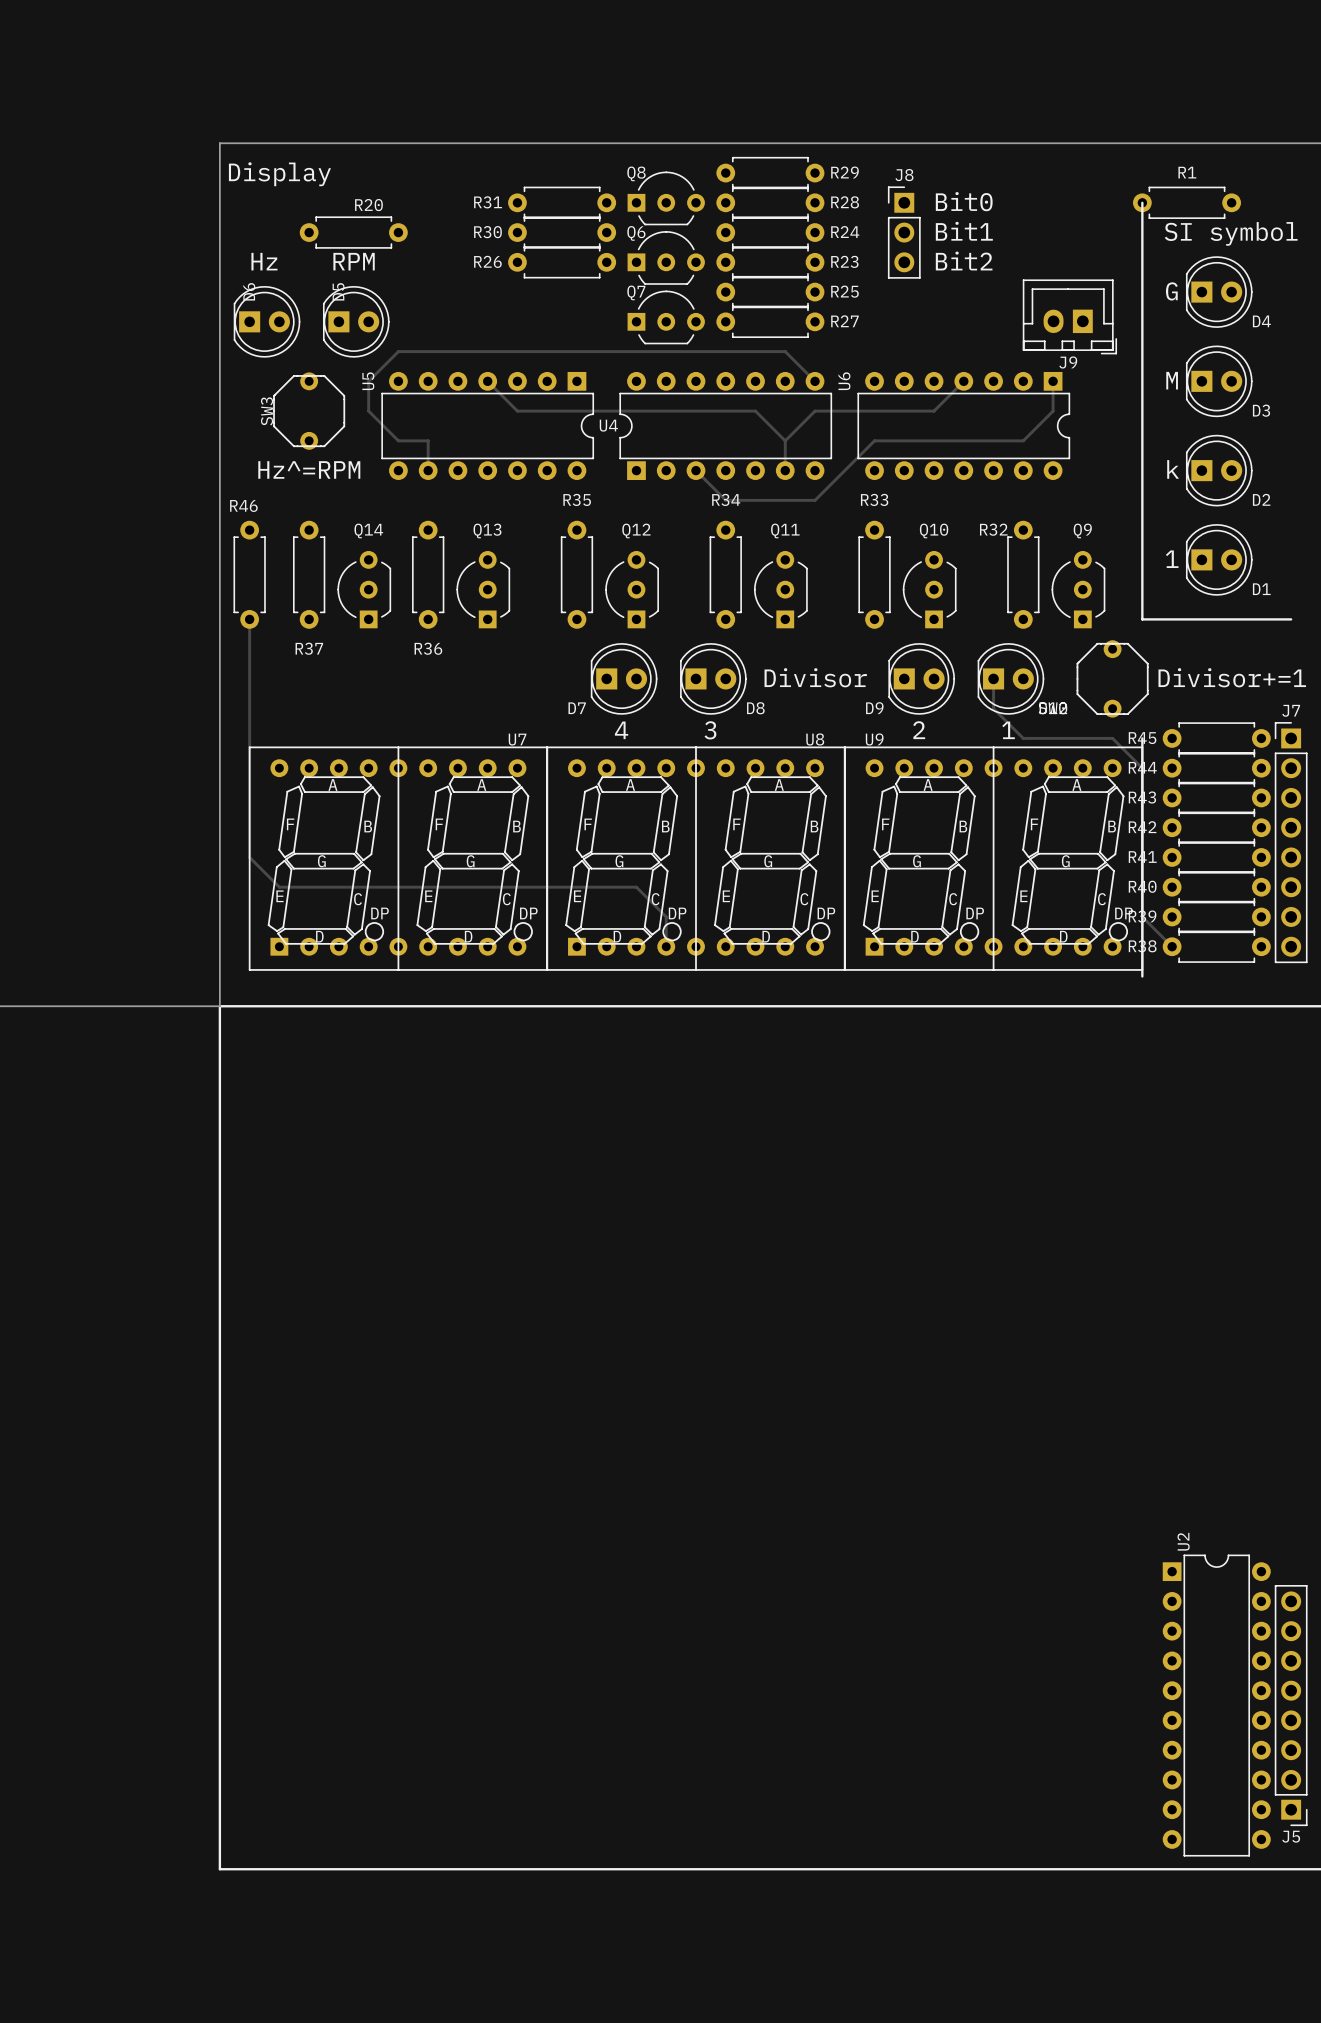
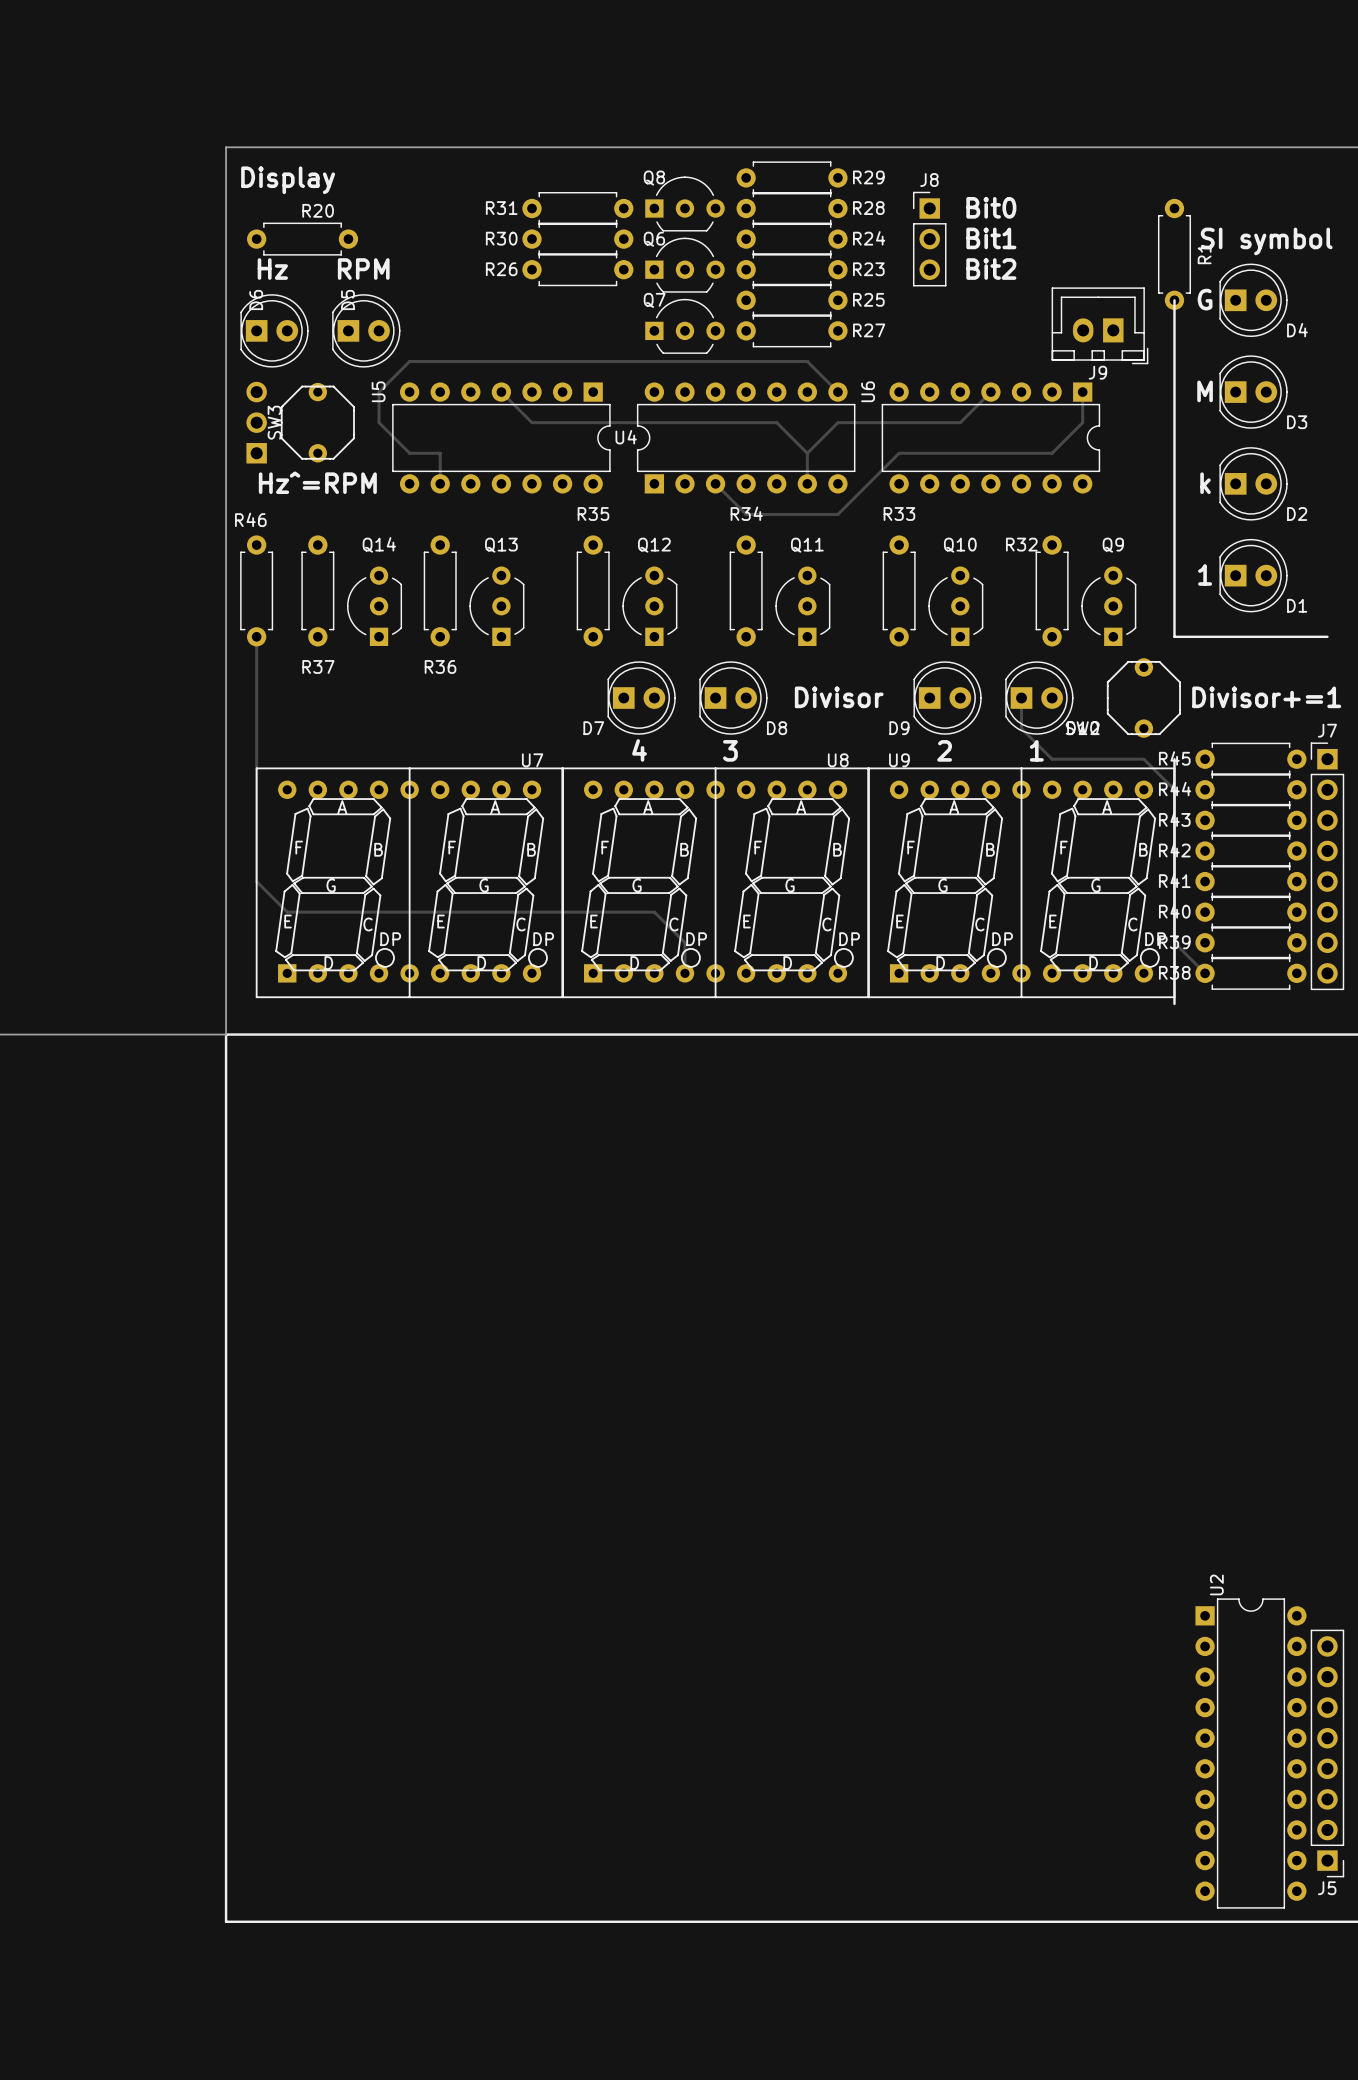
line: (1142, 202) (1142, 292) -> none
R1 rotation: 0° (1186, 202) -> 90° clockwise (1174, 254)
R20 position: (353, 232) -> (302, 239)
part: none -> (256, 422)

